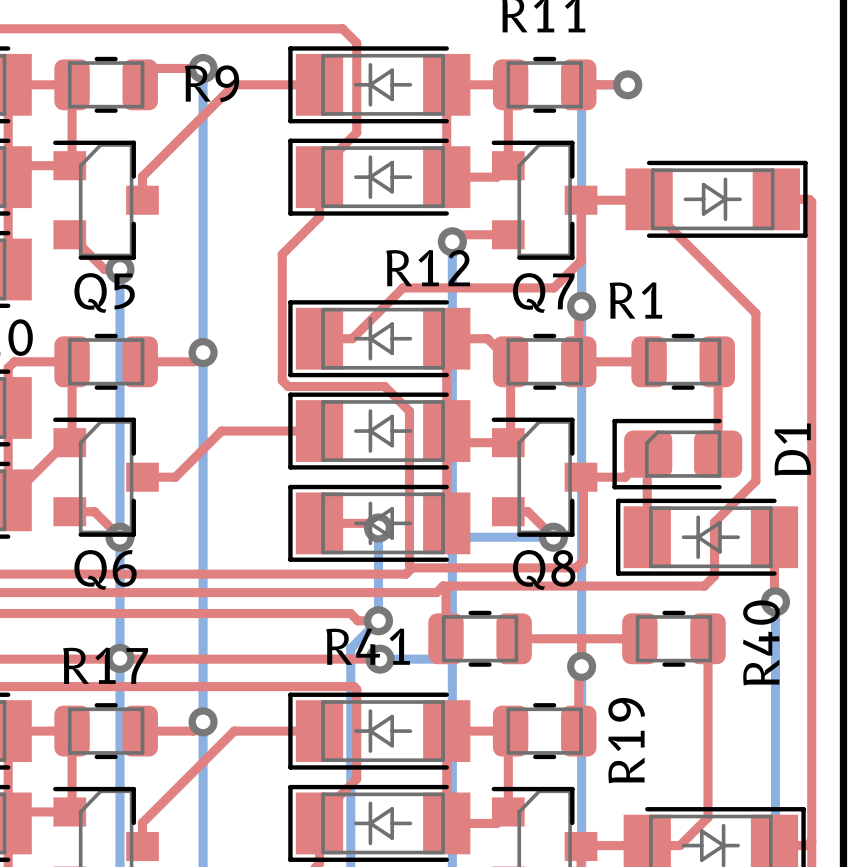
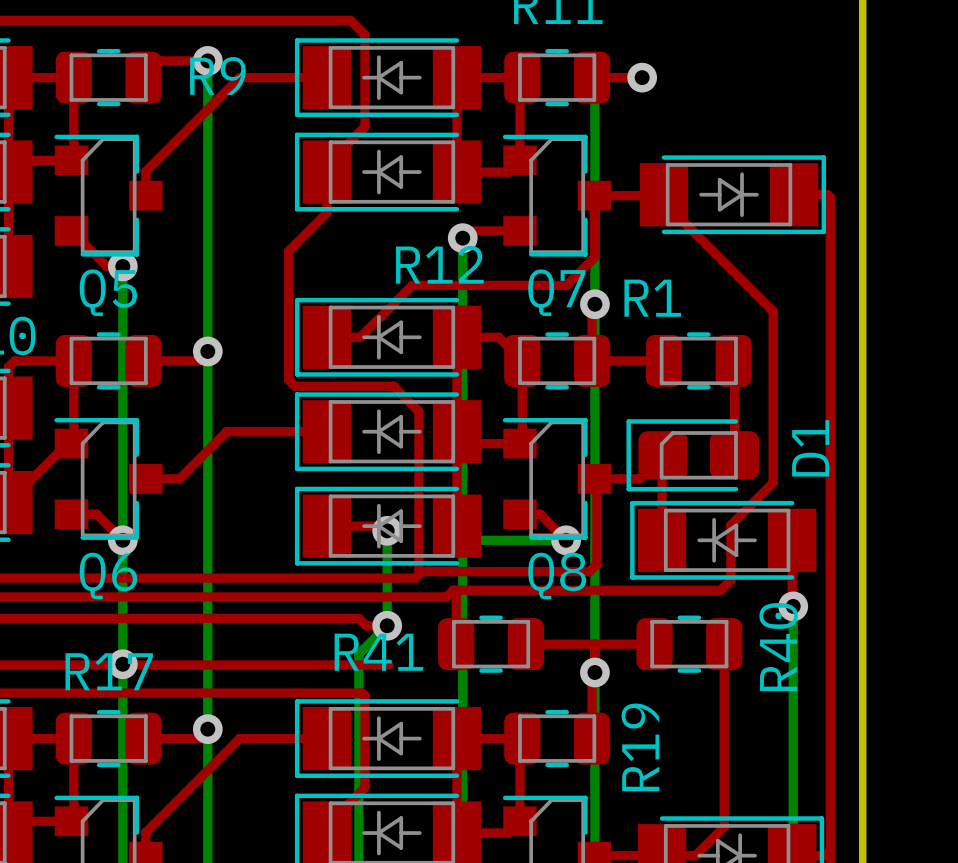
bottom track: (379, 659) (441, 659) -> none
via: (379, 659) -> none

